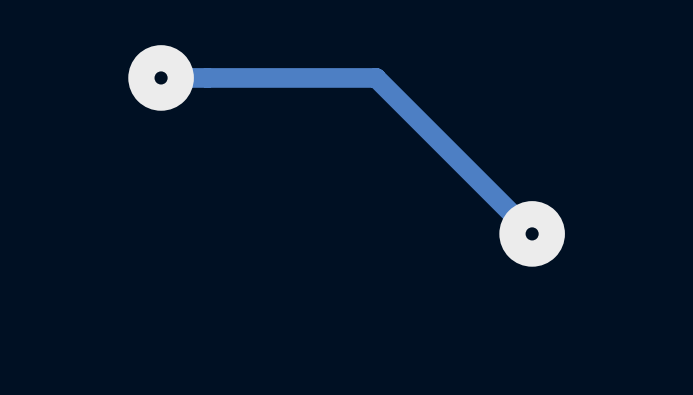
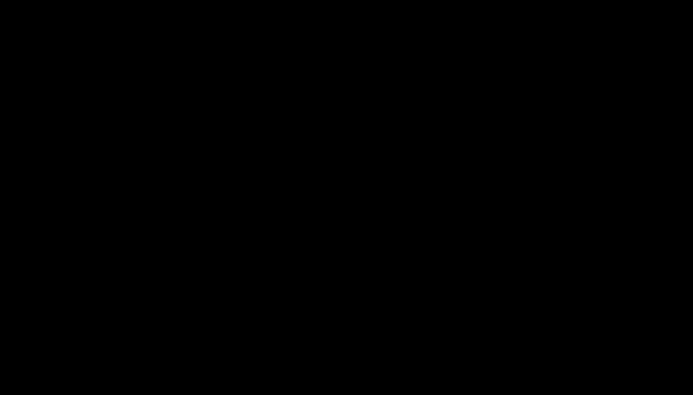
track: (161, 77) (376, 77) (532, 233) -> none
via: (161, 77) -> none
via: (532, 233) -> none

